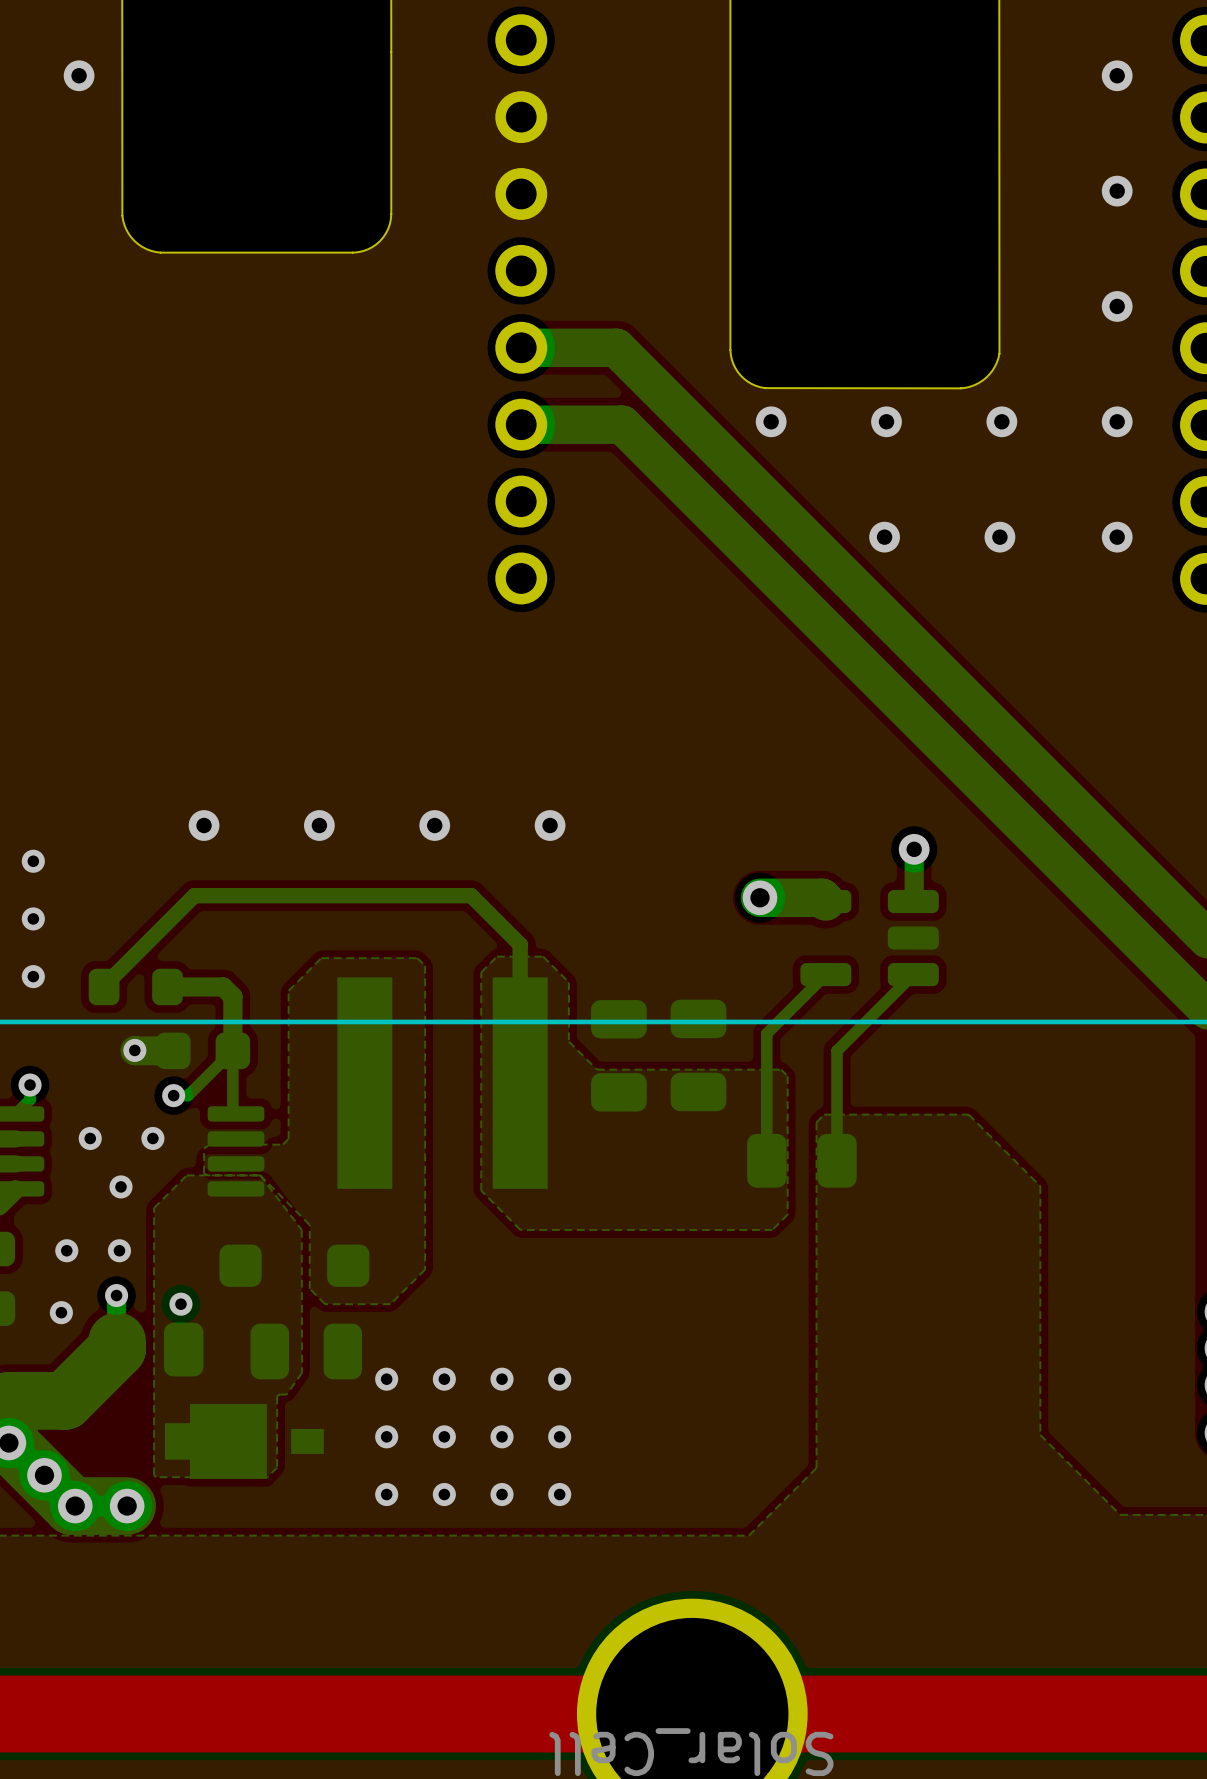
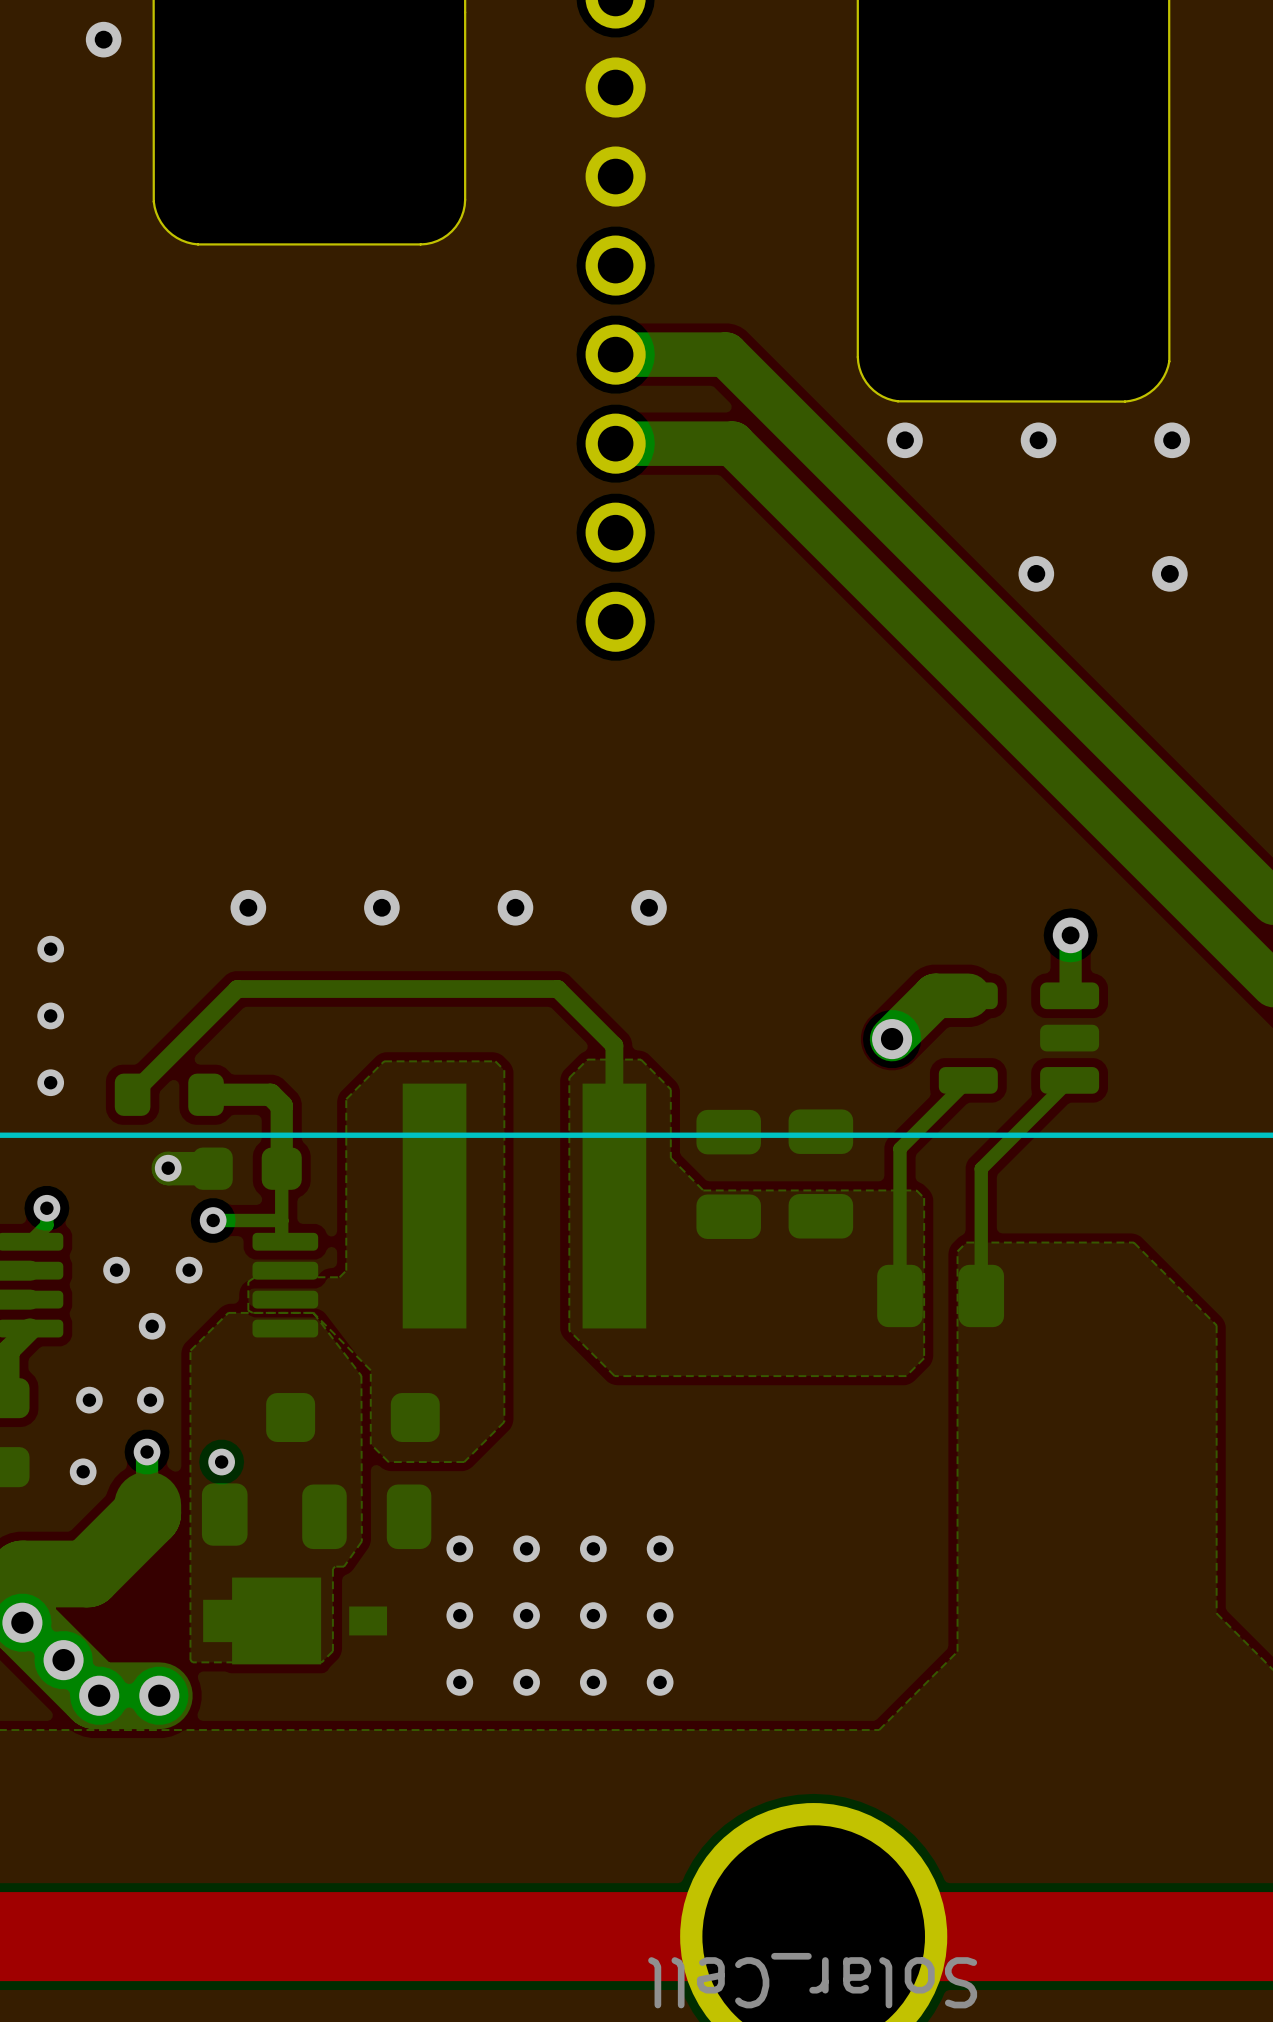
bottom track: (760, 897) (822, 897) (825, 901) -> (892, 1039) (935, 995) (968, 995)
via position: (760, 897) -> (892, 1039)
bottom track: (232, 1050) (188, 1095) -> (281, 1220) (229, 1220)

